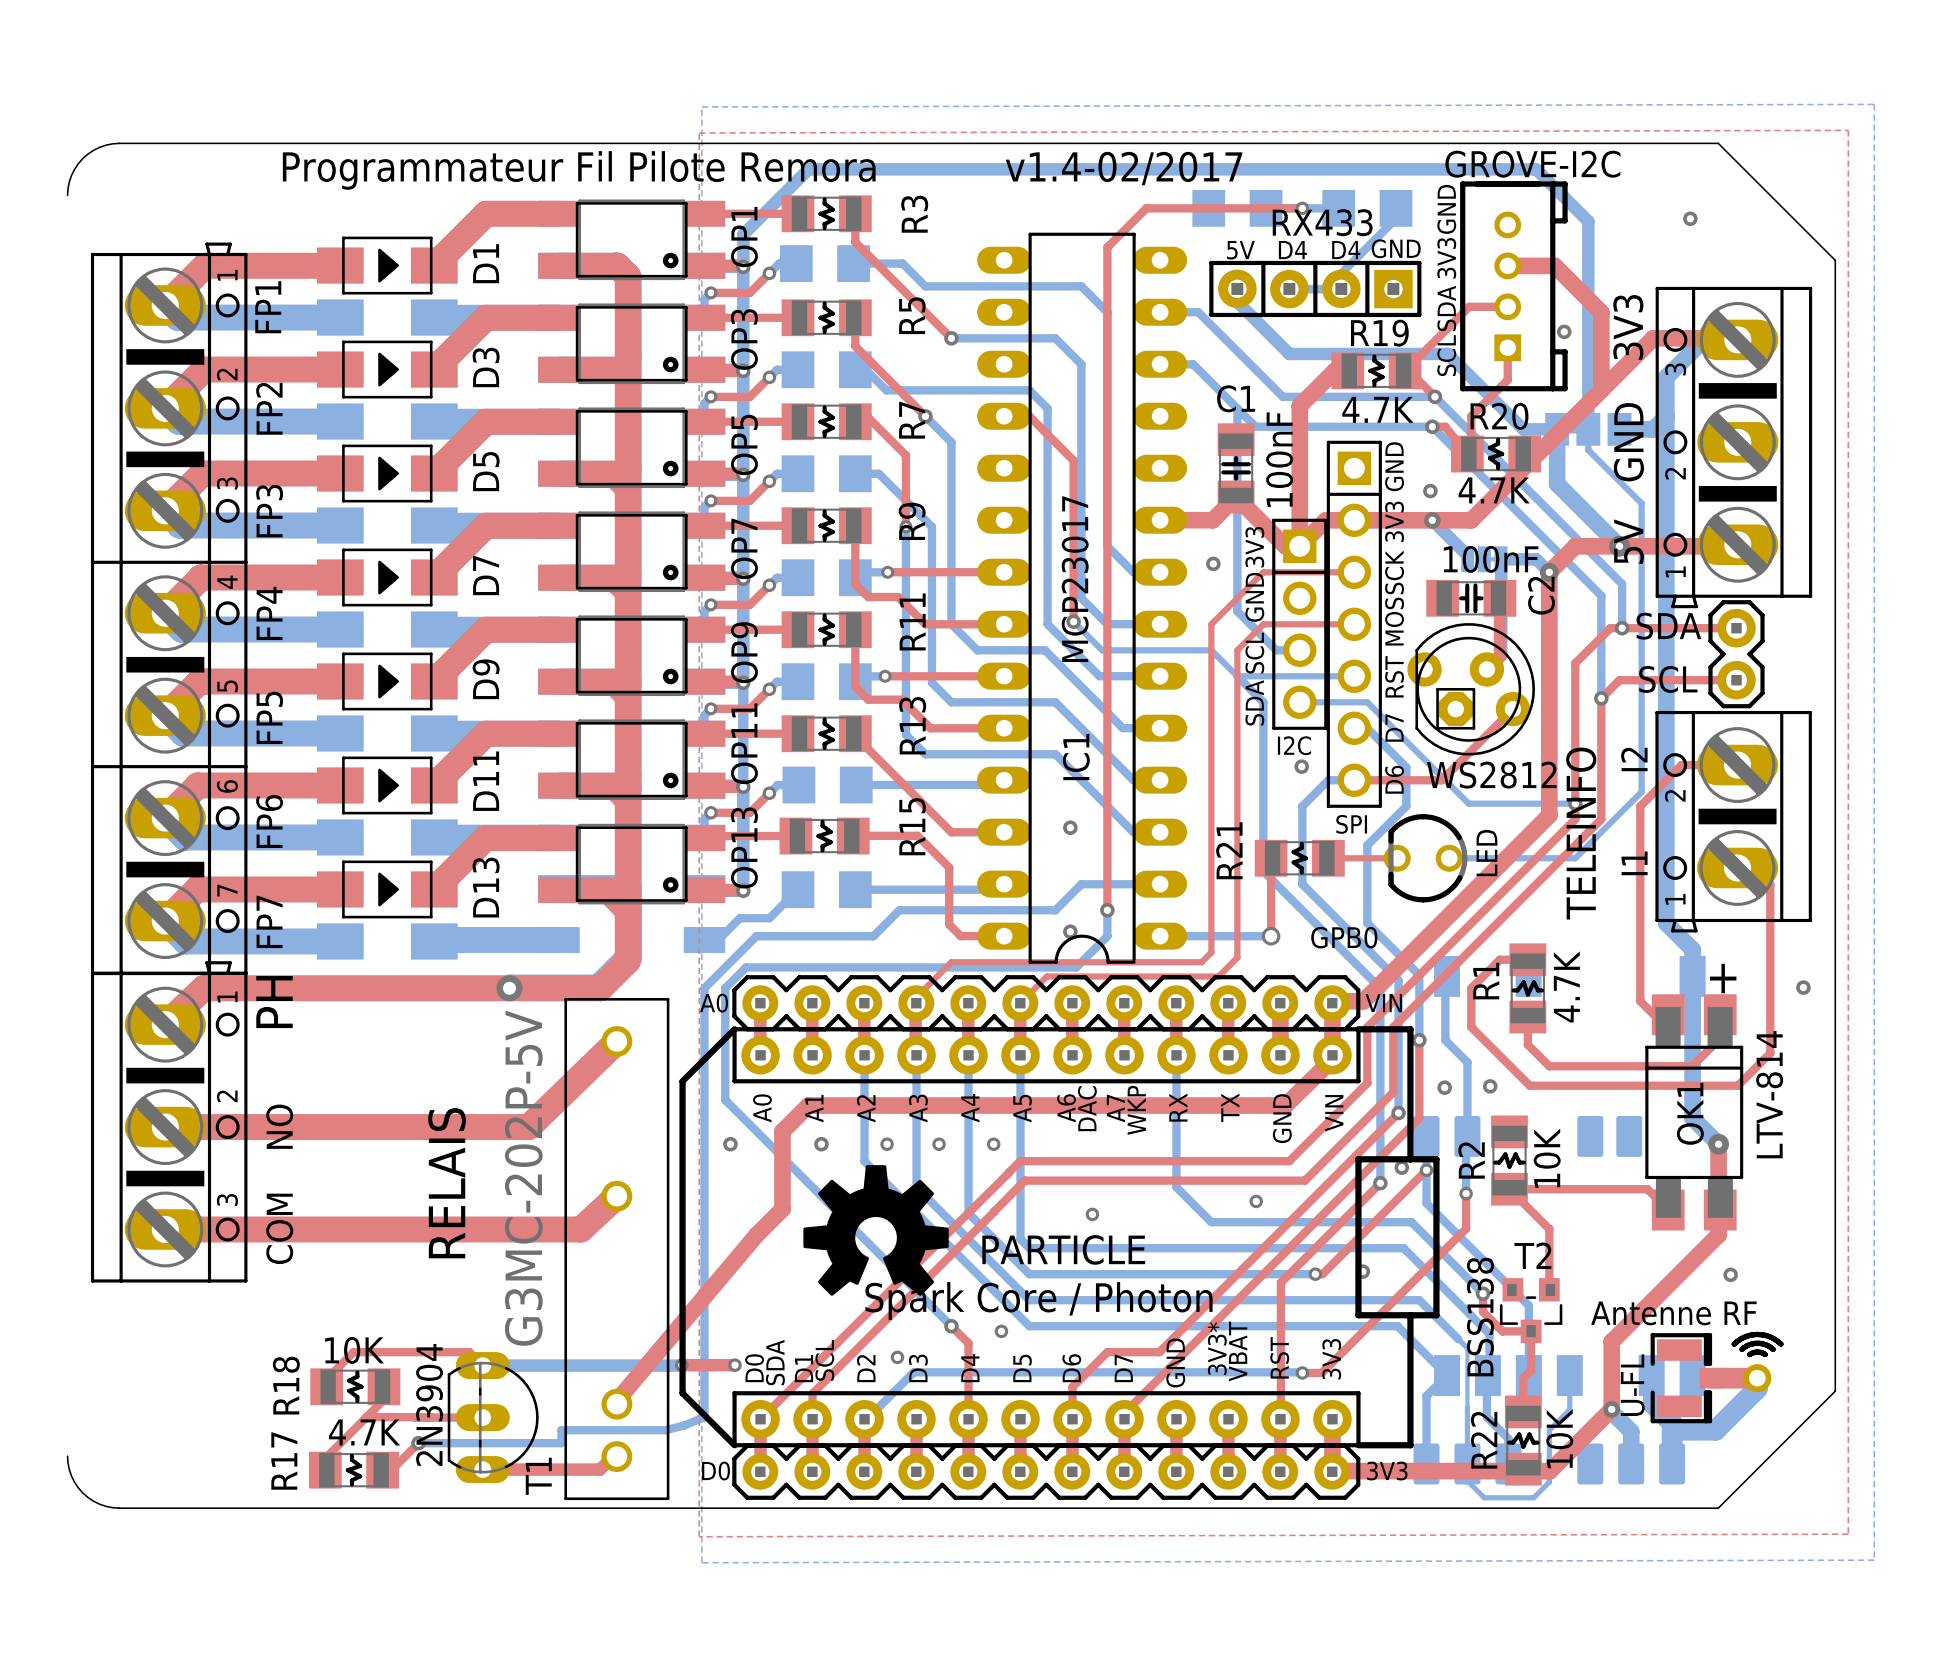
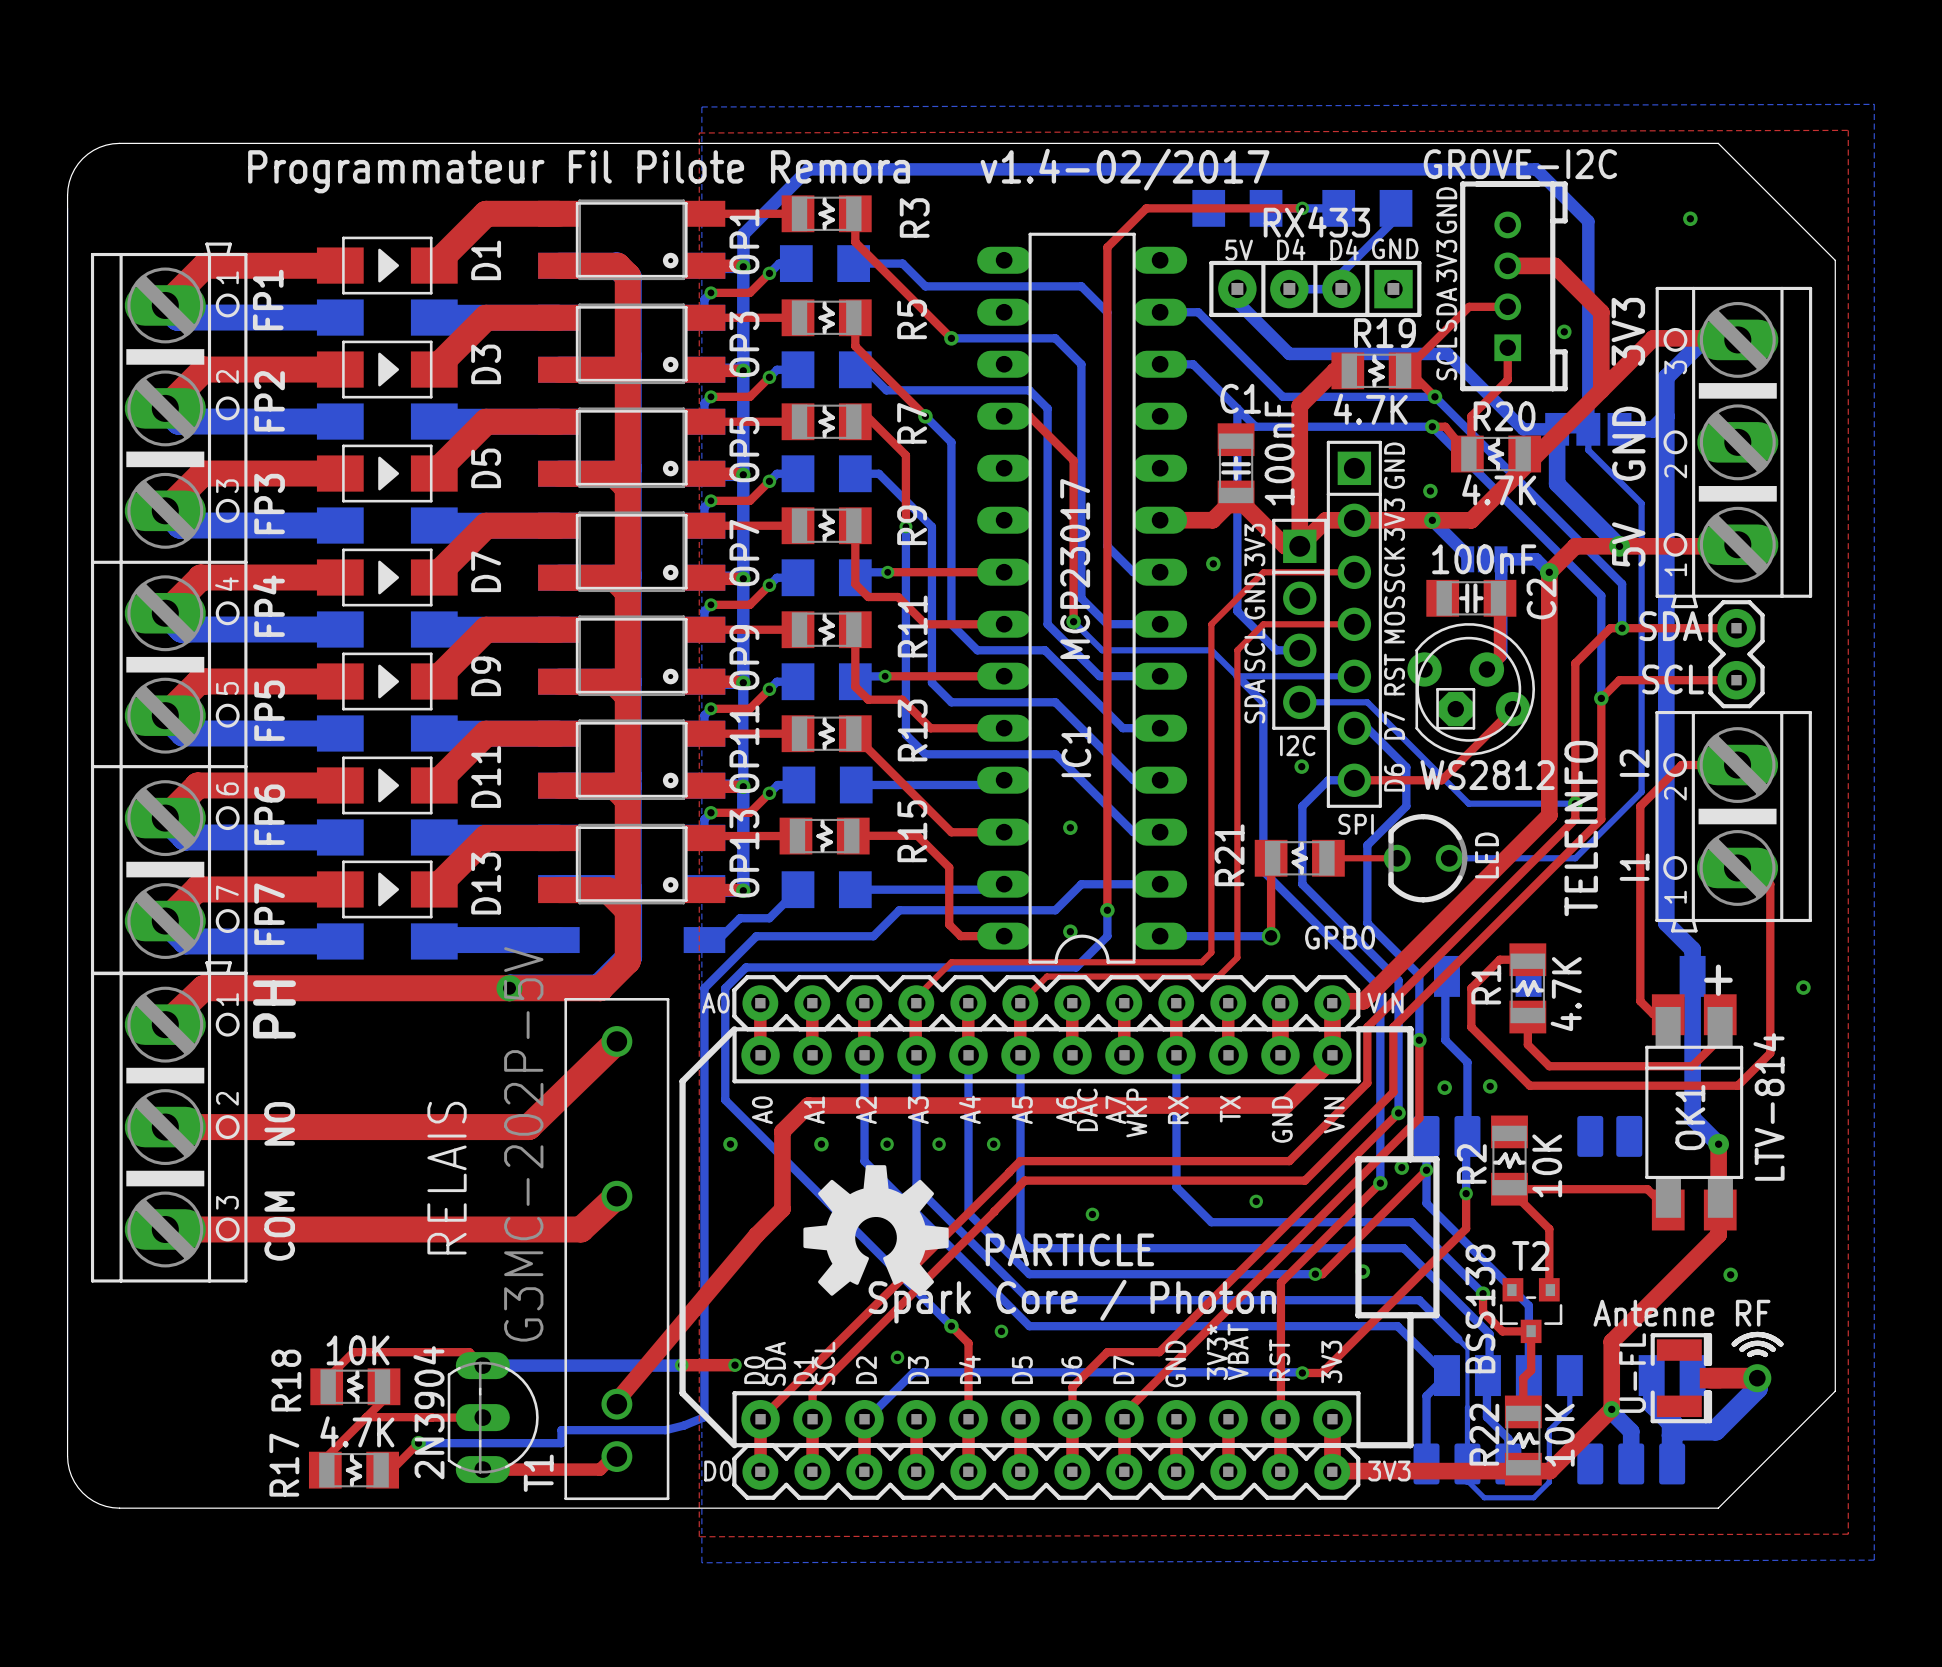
board edge: none -> (67, 195) (67, 1456)

